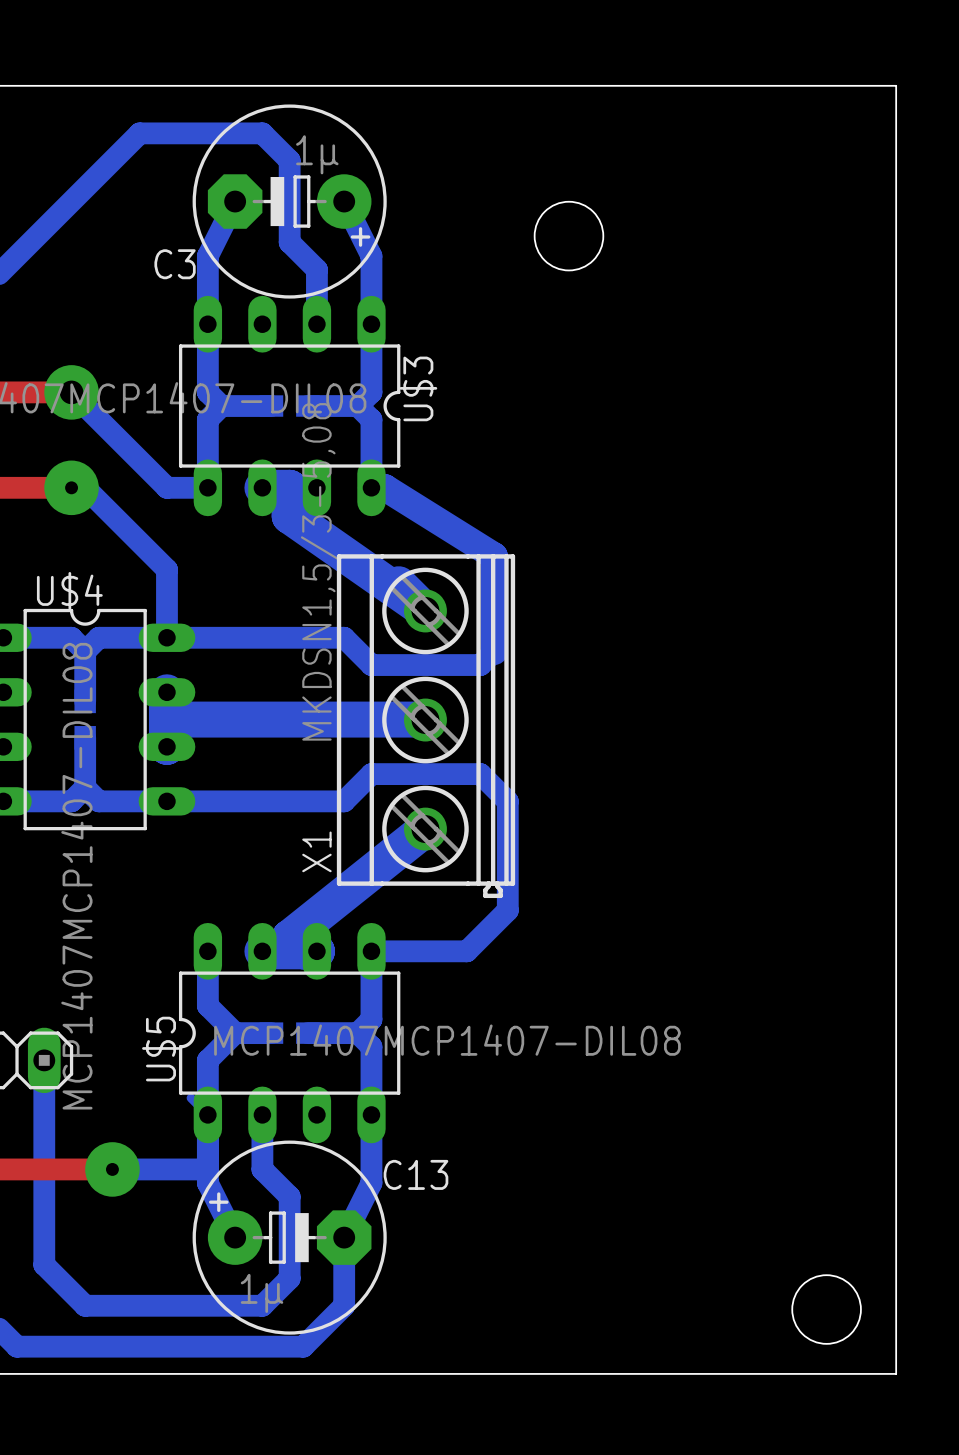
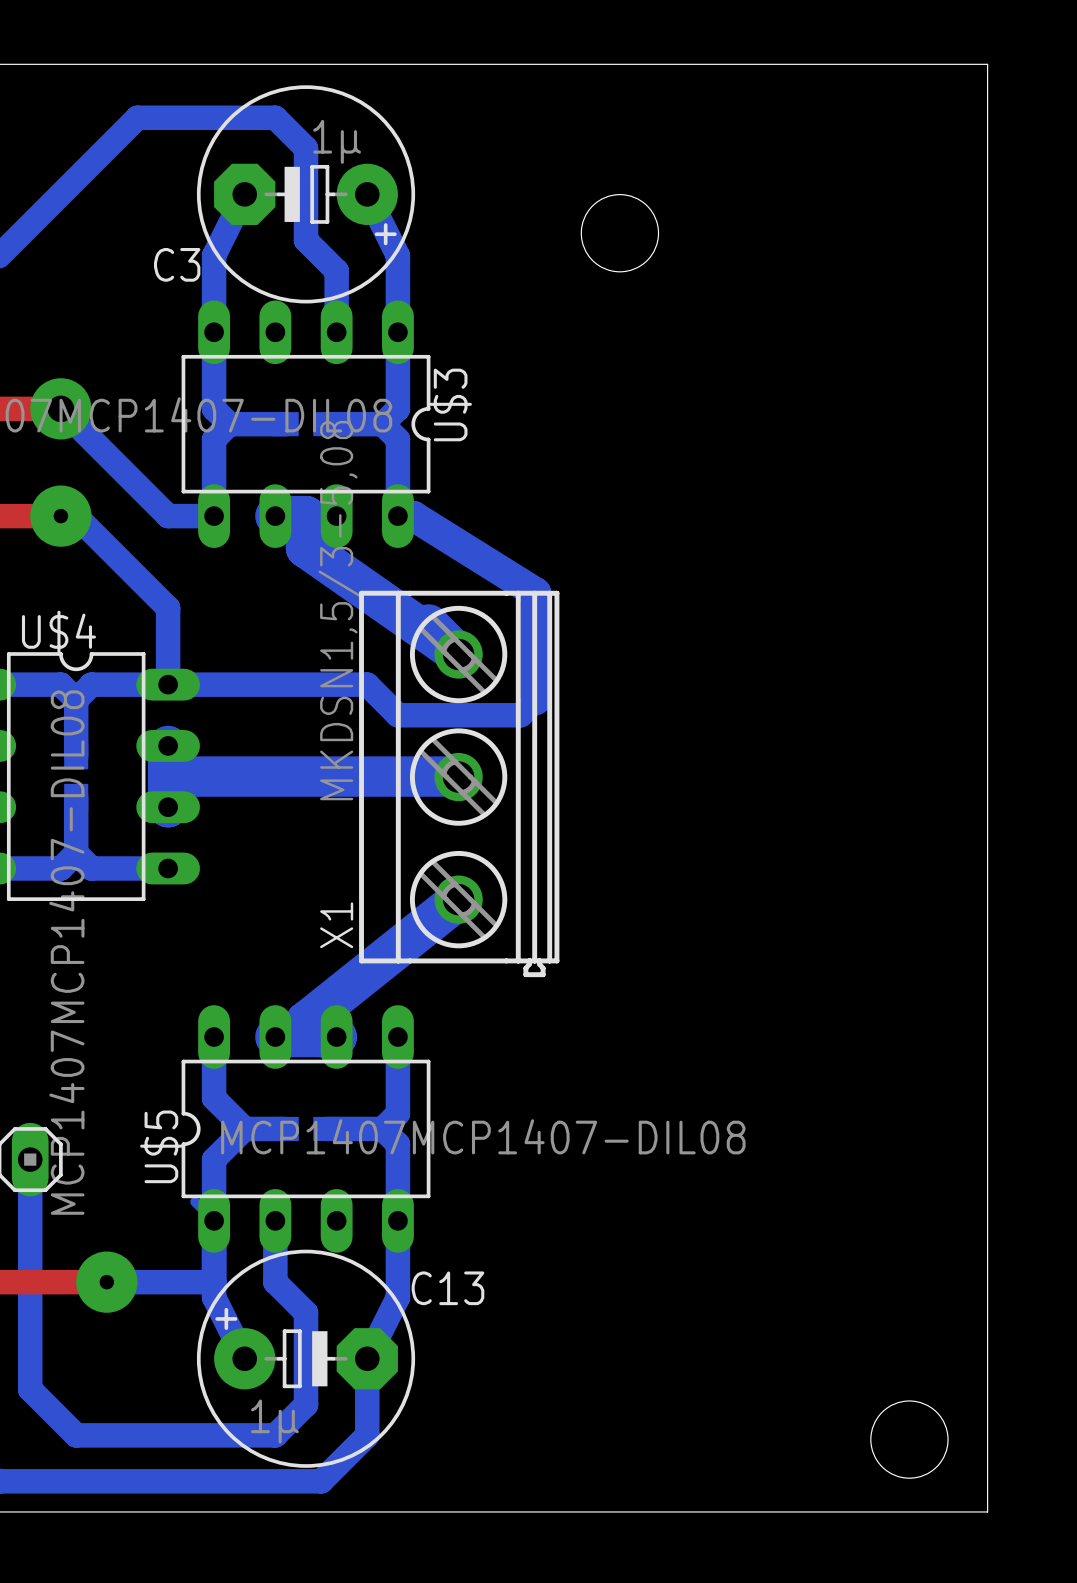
bottom track: (166, 801) (344, 801) (371, 774) (480, 774) (507, 801) (507, 910) (466, 951) (371, 951) -> none

